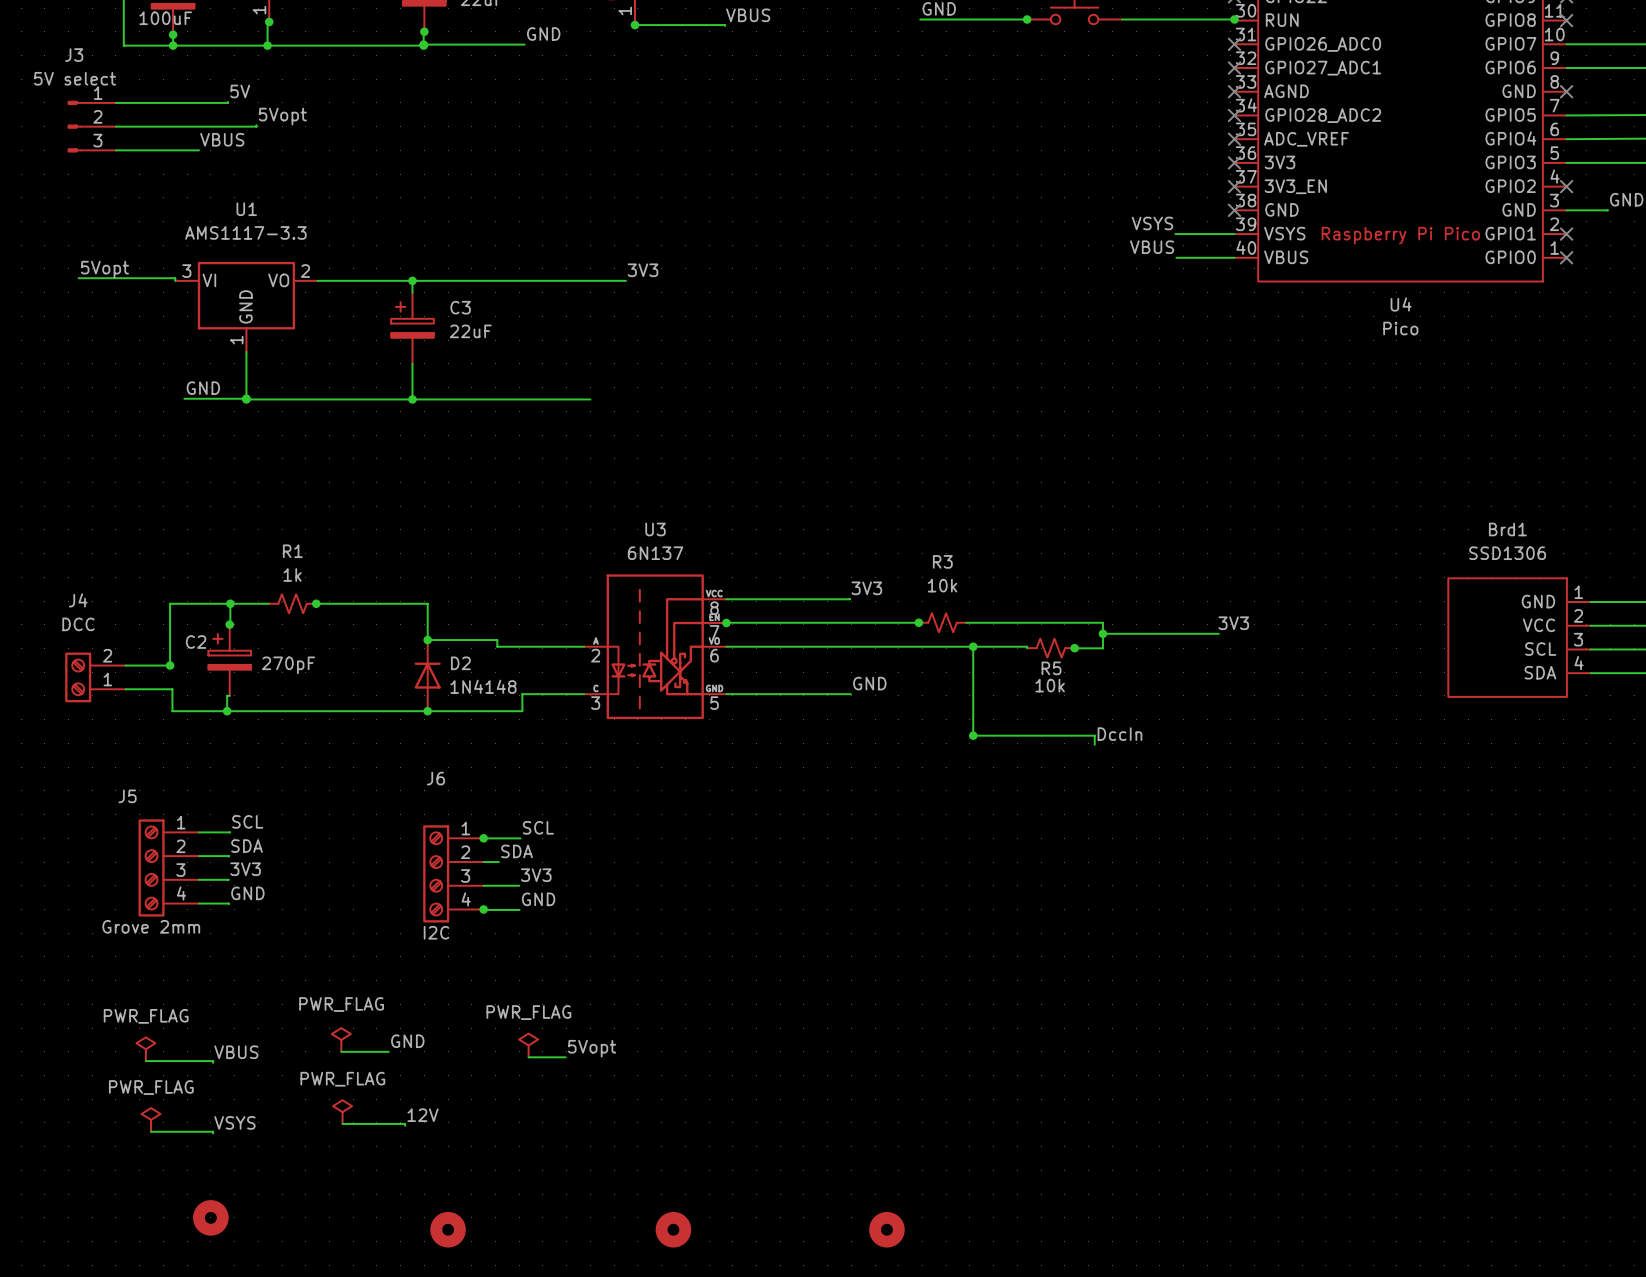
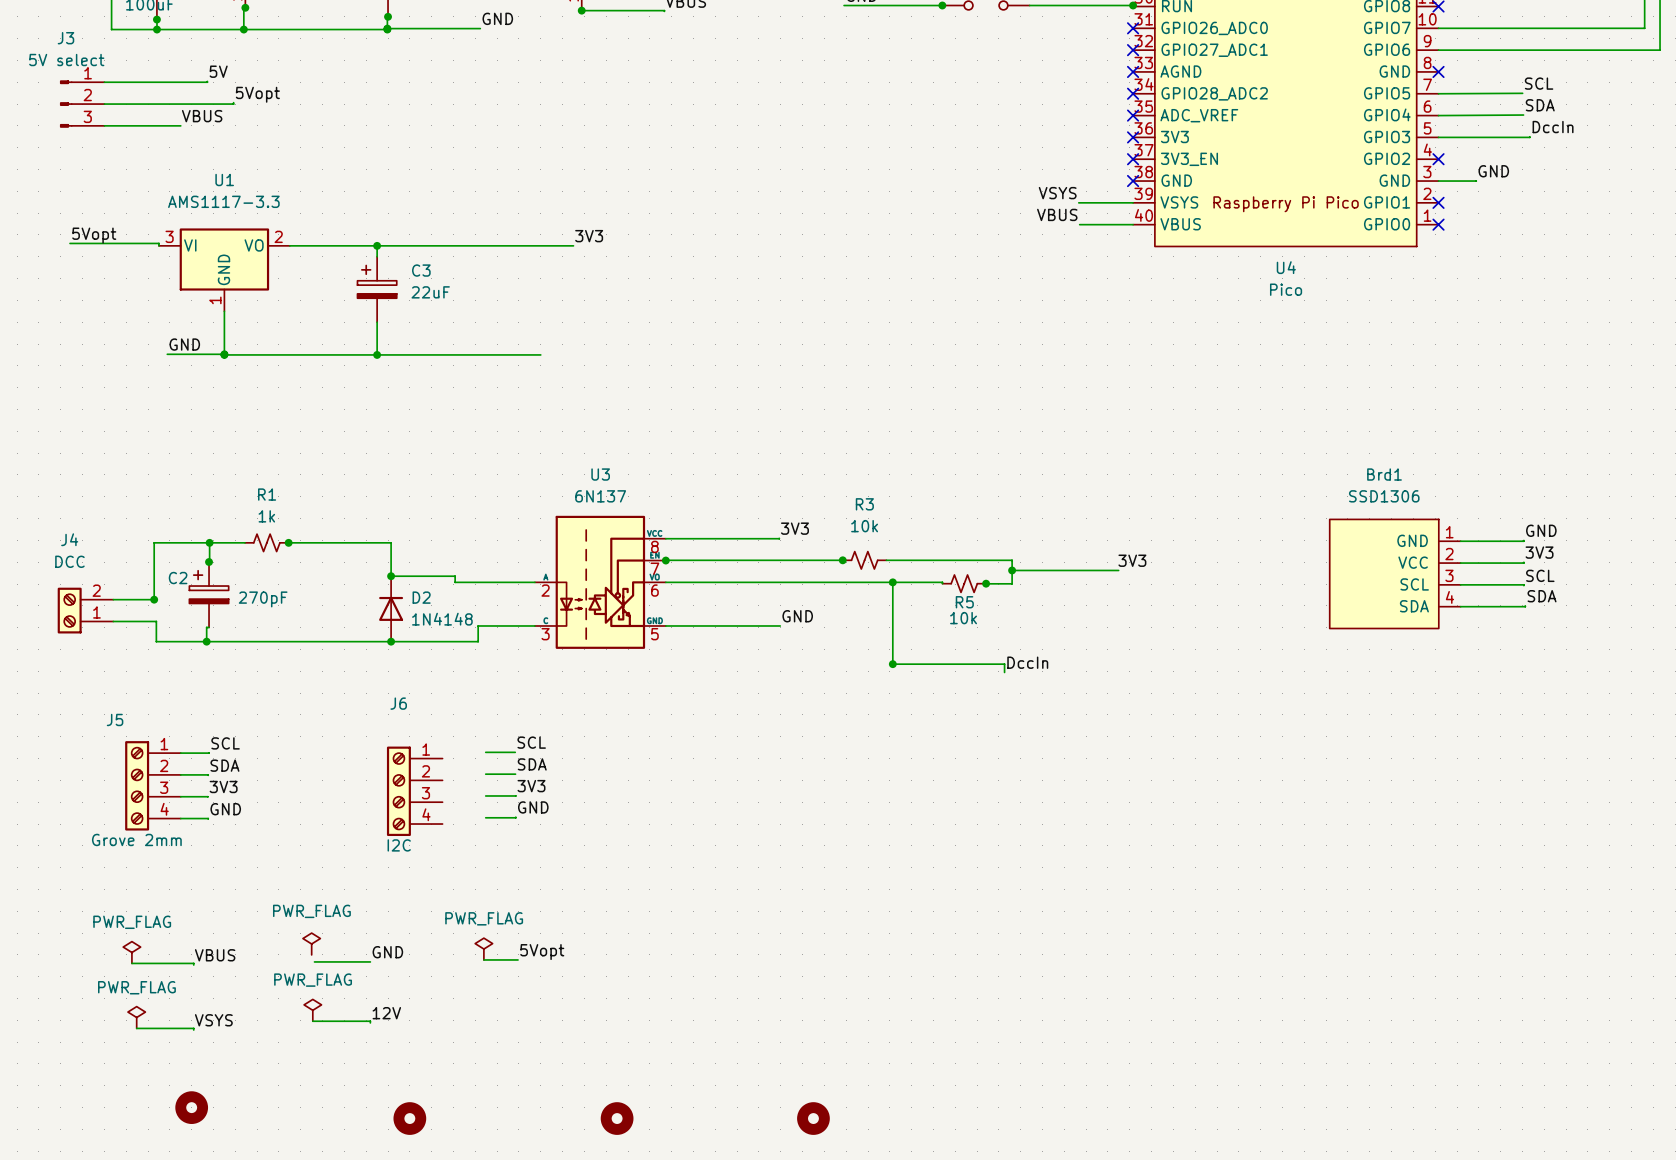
label position: SCL (538, 827) -> SCL (531, 742)
wire: none -> (485, 752) (515, 752)
wire: (483, 838) (520, 838) -> none
junction: (483, 838) -> none
label position: SDA (517, 851) -> SDA (532, 764)
wire: none -> (485, 774) (515, 774)
wire: (483, 862) (498, 862) -> none
label position: 3V3 (536, 875) -> 3V3 (531, 786)
wire: none -> (485, 795) (515, 795)
wire: (483, 885) (519, 885) -> none
label position: GND (538, 899) -> GND (533, 807)
wire: none -> (515, 817) (485, 817)
wire: (483, 909) (519, 909) -> none
junction: (483, 909) -> none
label position: GND (407, 1041) -> GND (387, 952)
wire: (341, 1051) (388, 1051) -> none
wire: none -> (314, 961) (370, 961)

